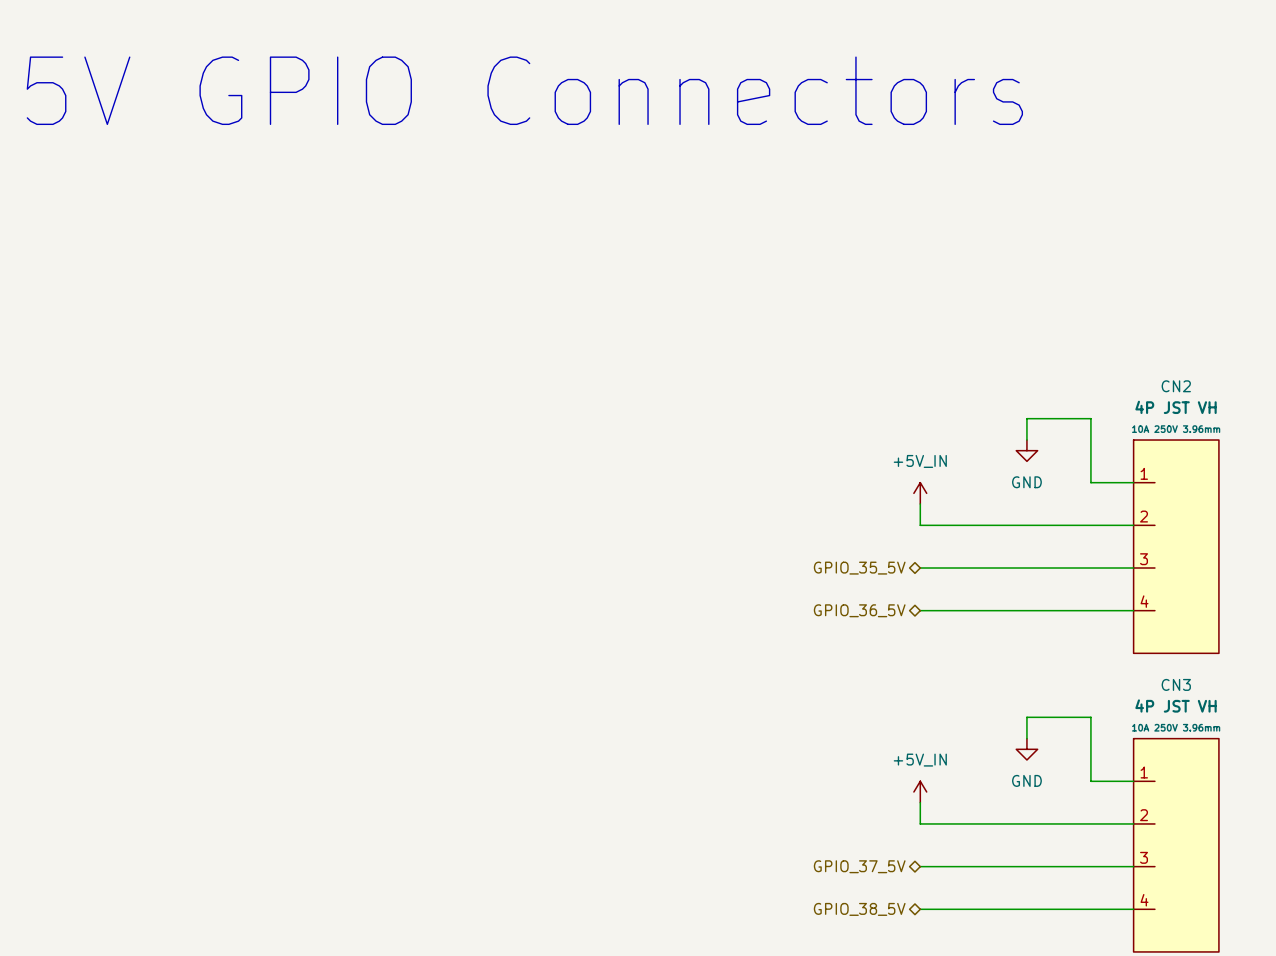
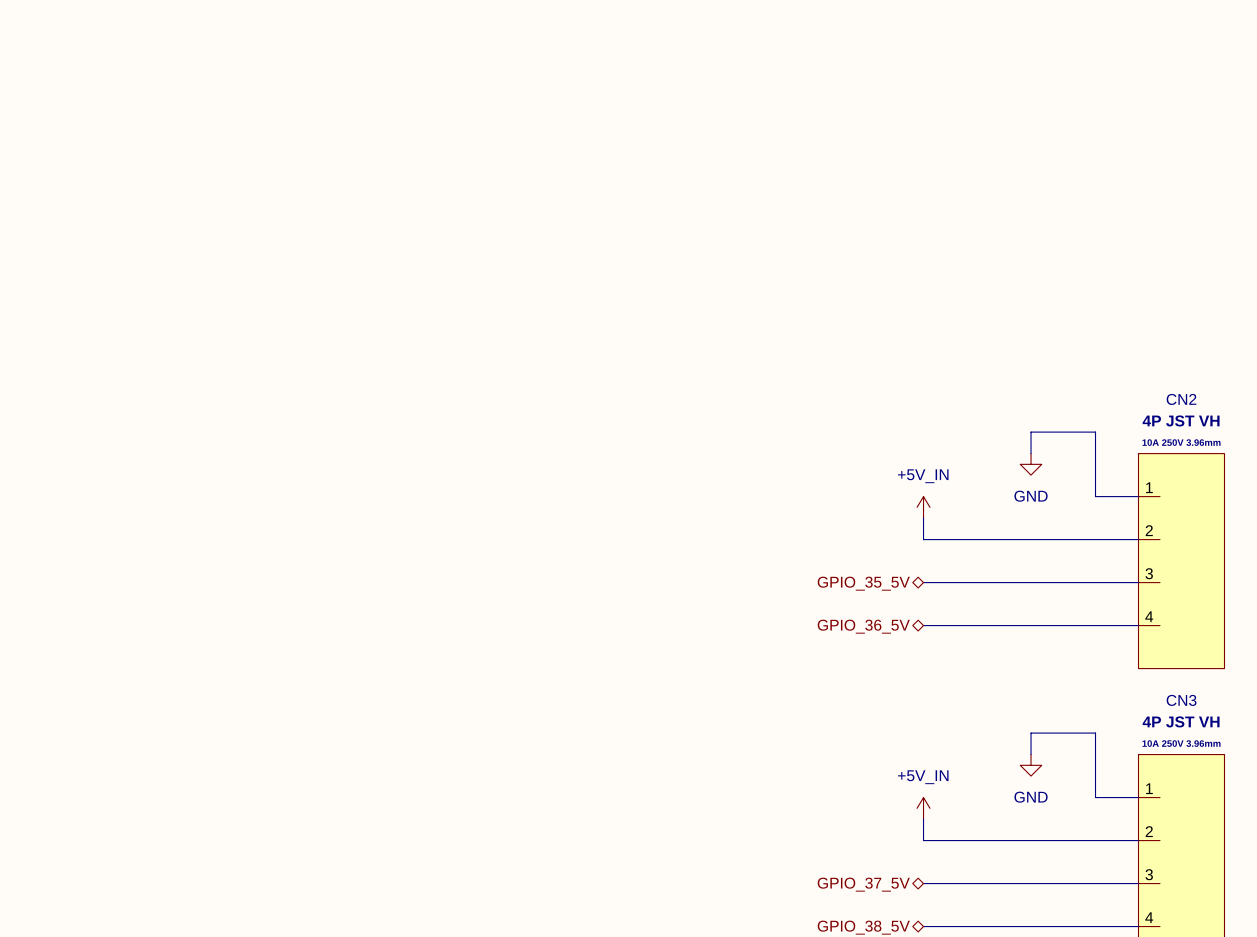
text: 5V GPIO Connectors (524, 90) -> none

